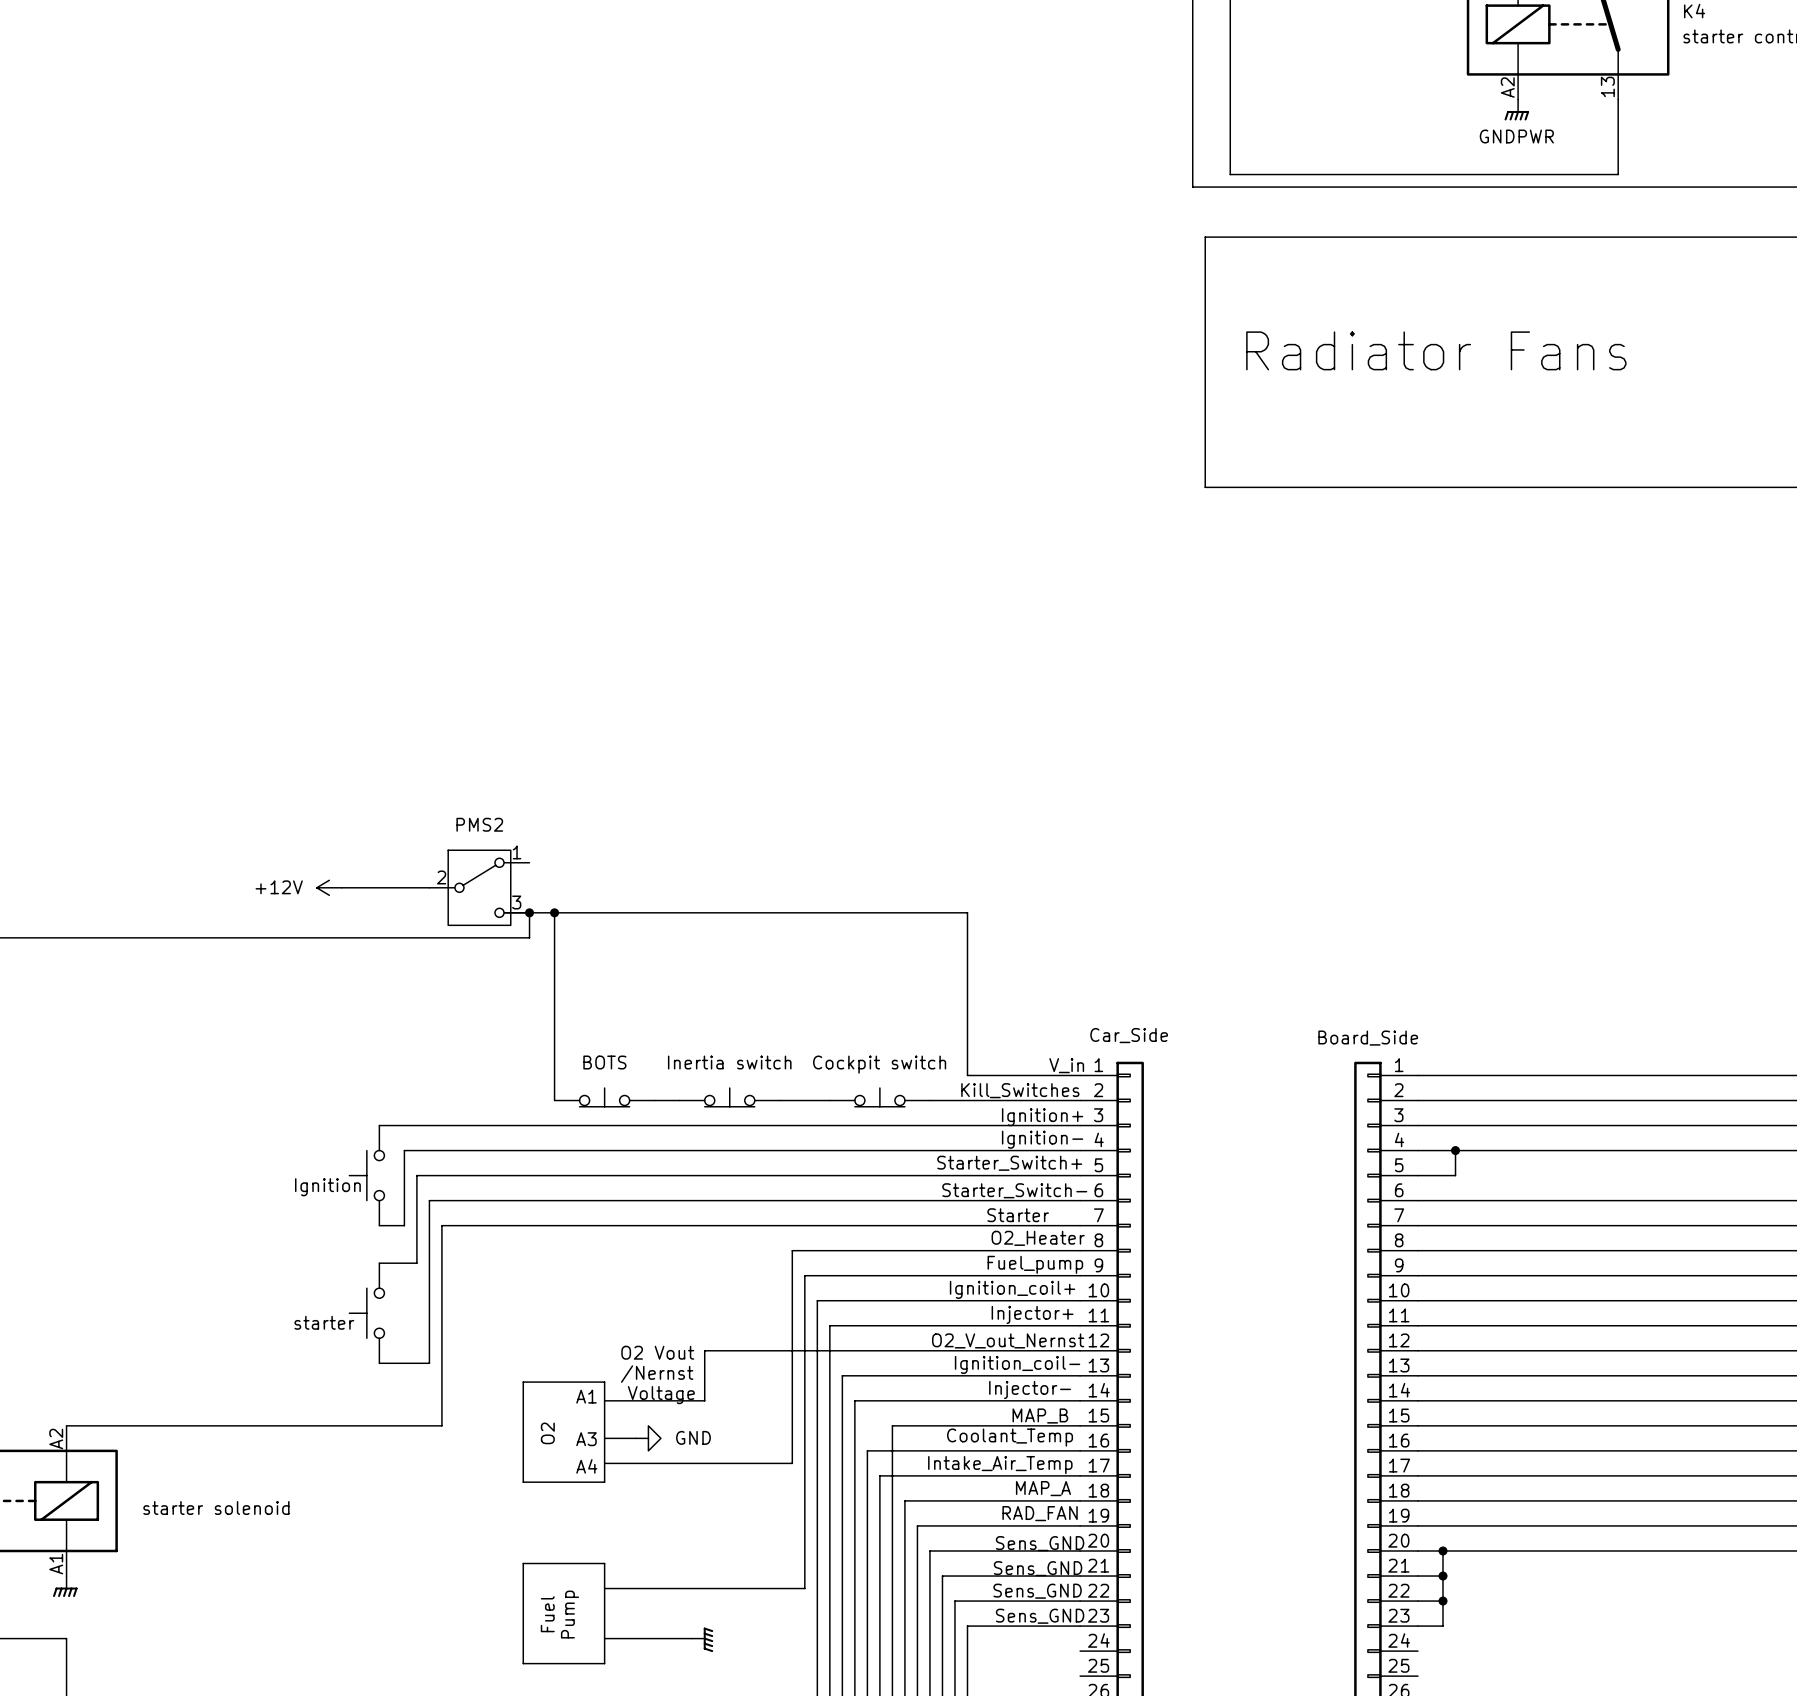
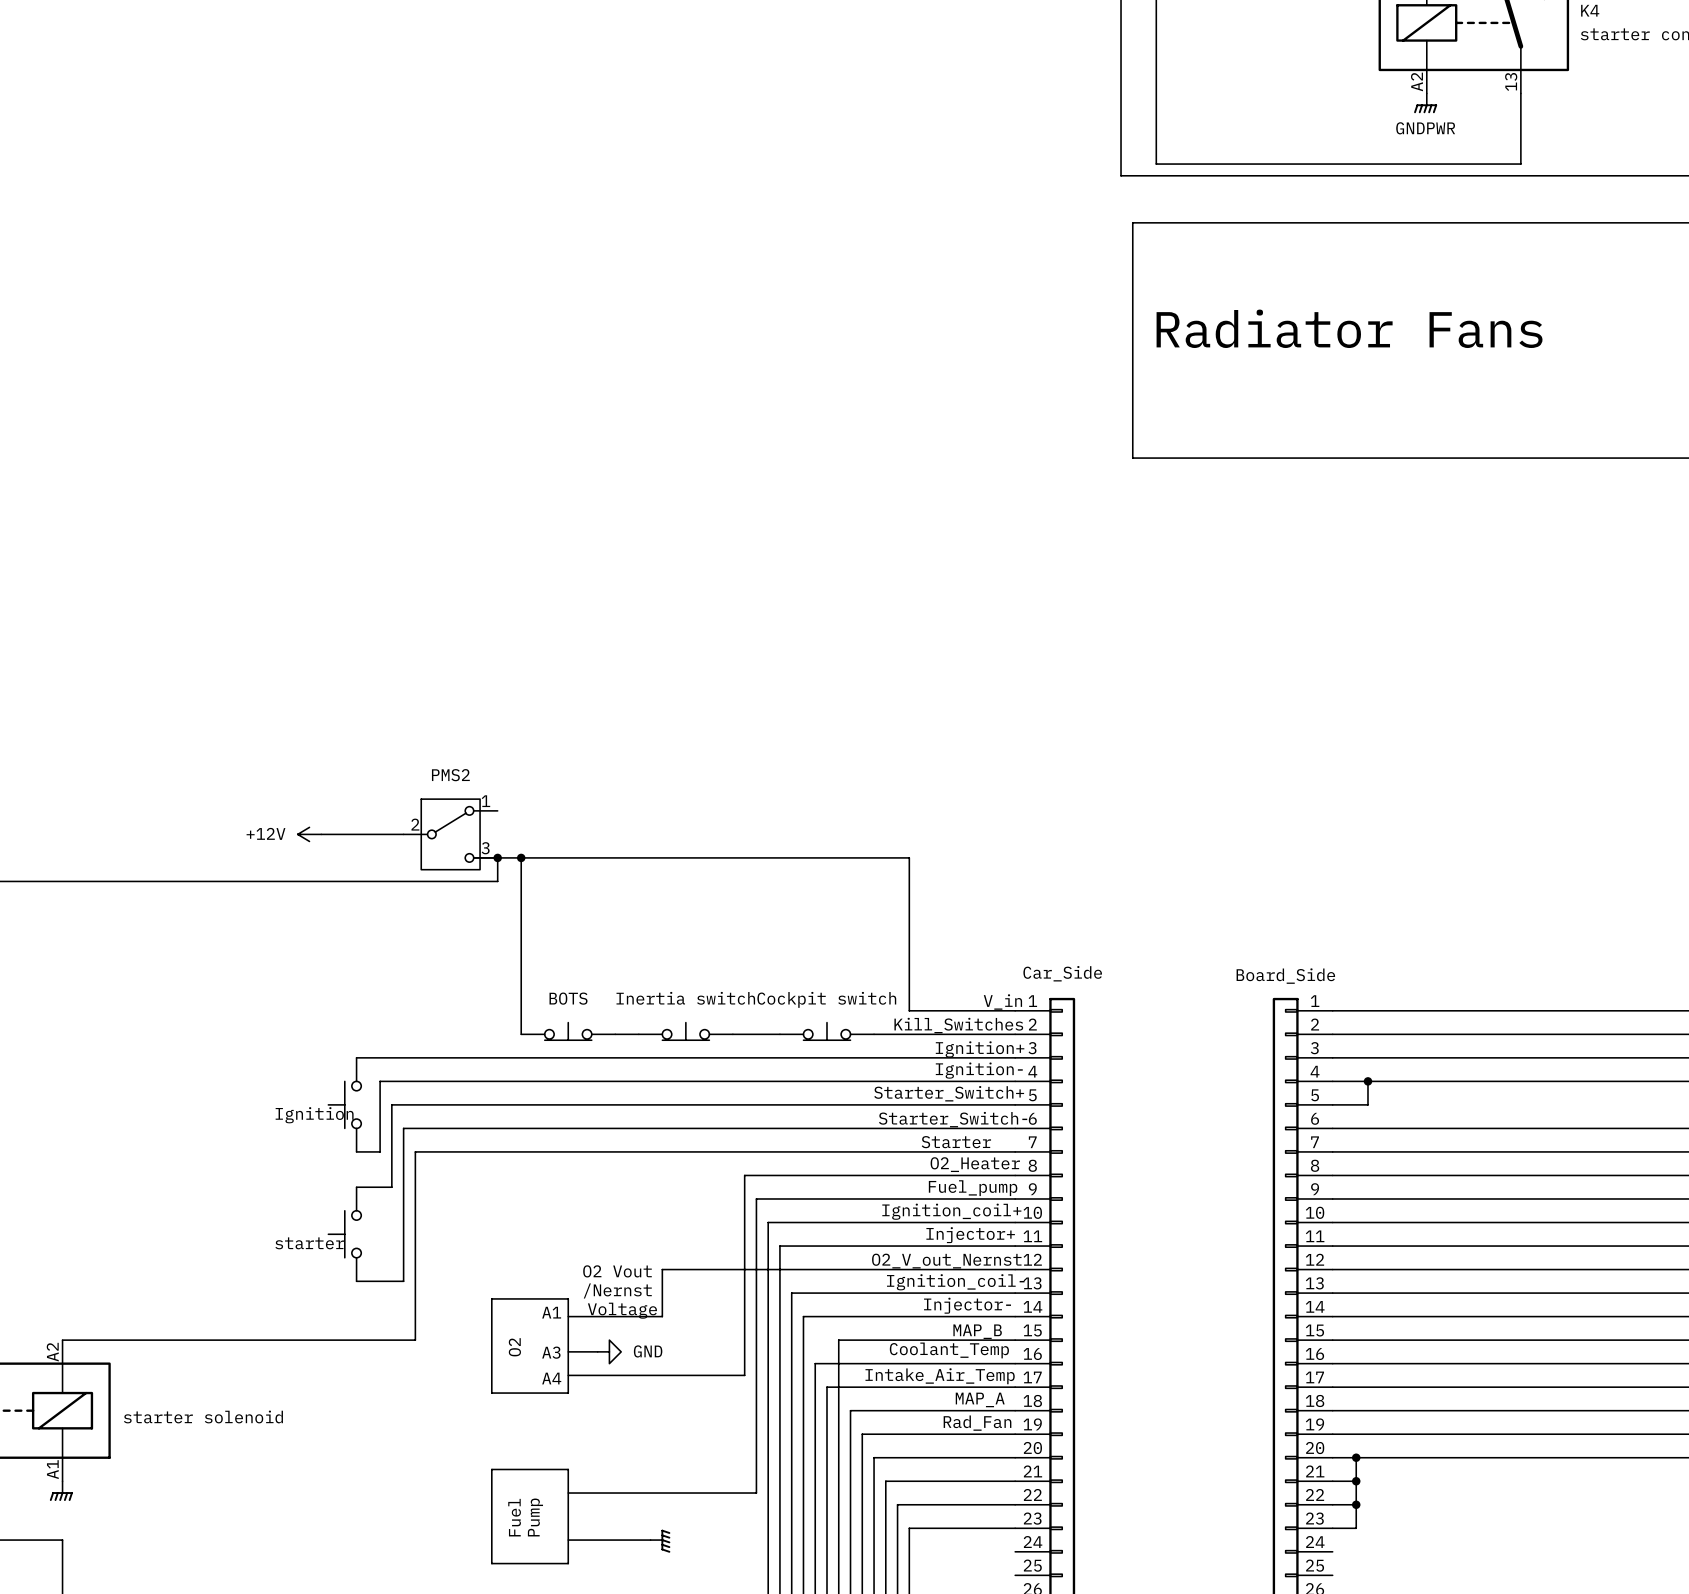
text: RAD_FAN (1040, 1513) -> Rad_Fan (977, 1423)
text: Sens_GND (1040, 1543) -> none
text: Sens_GND (1038, 1568) -> none
text: Sens_GND (1037, 1591) -> none
text: Sens_GND (1040, 1616) -> none

